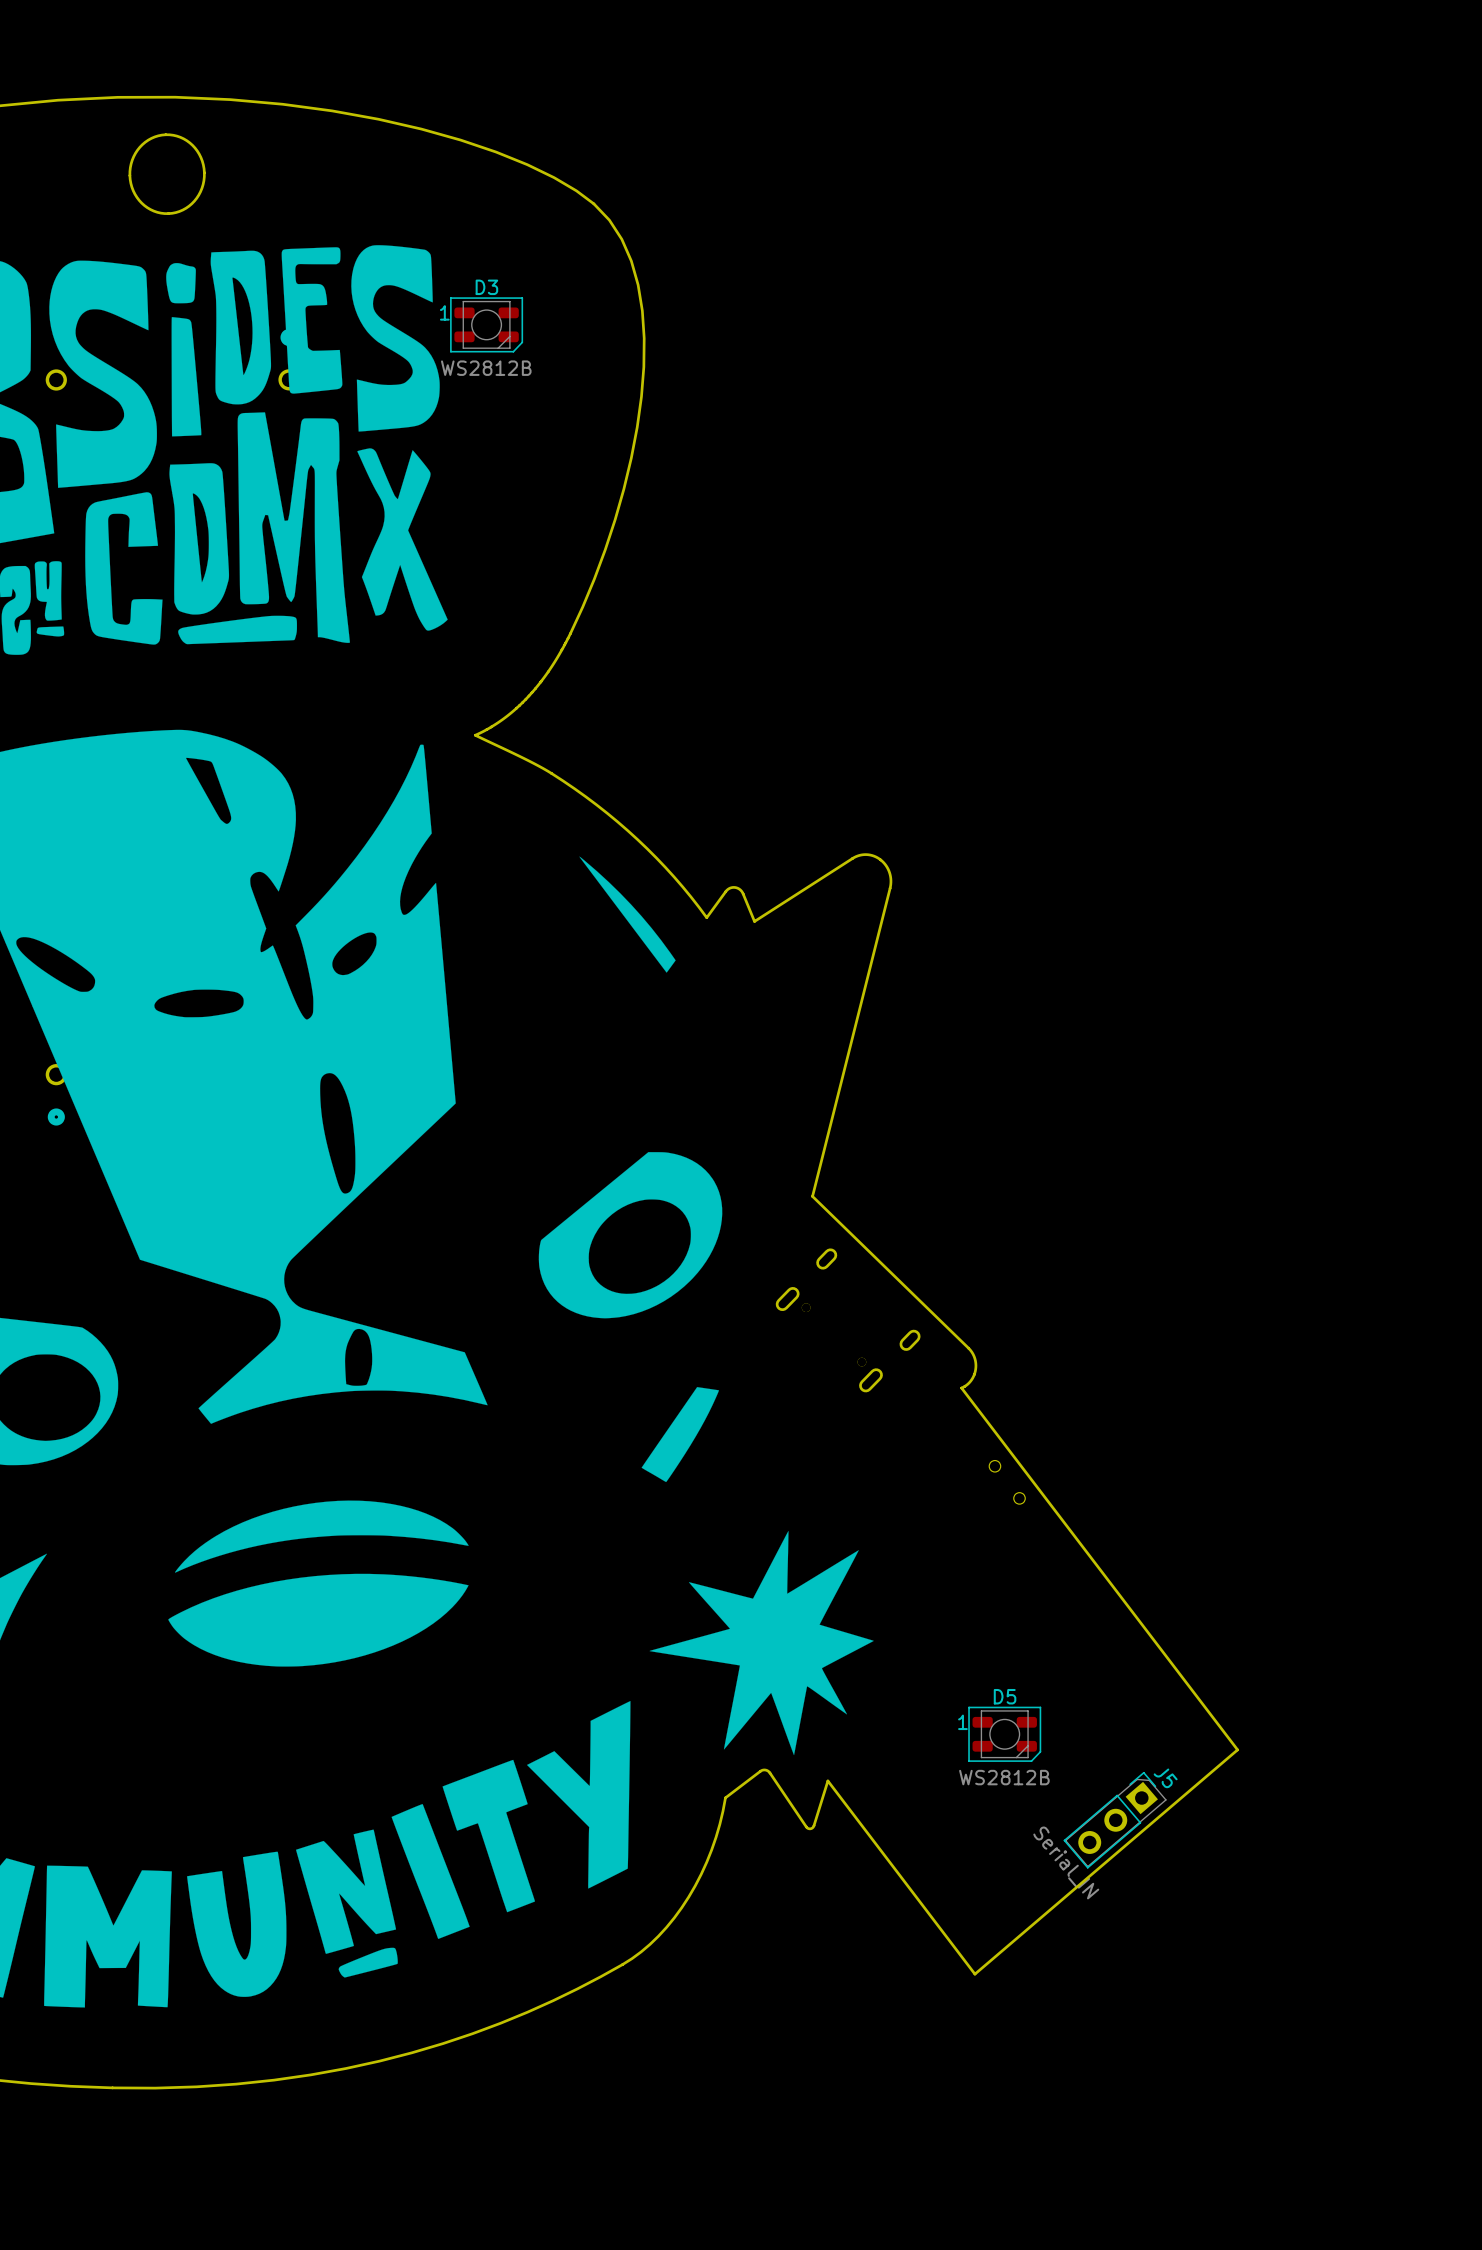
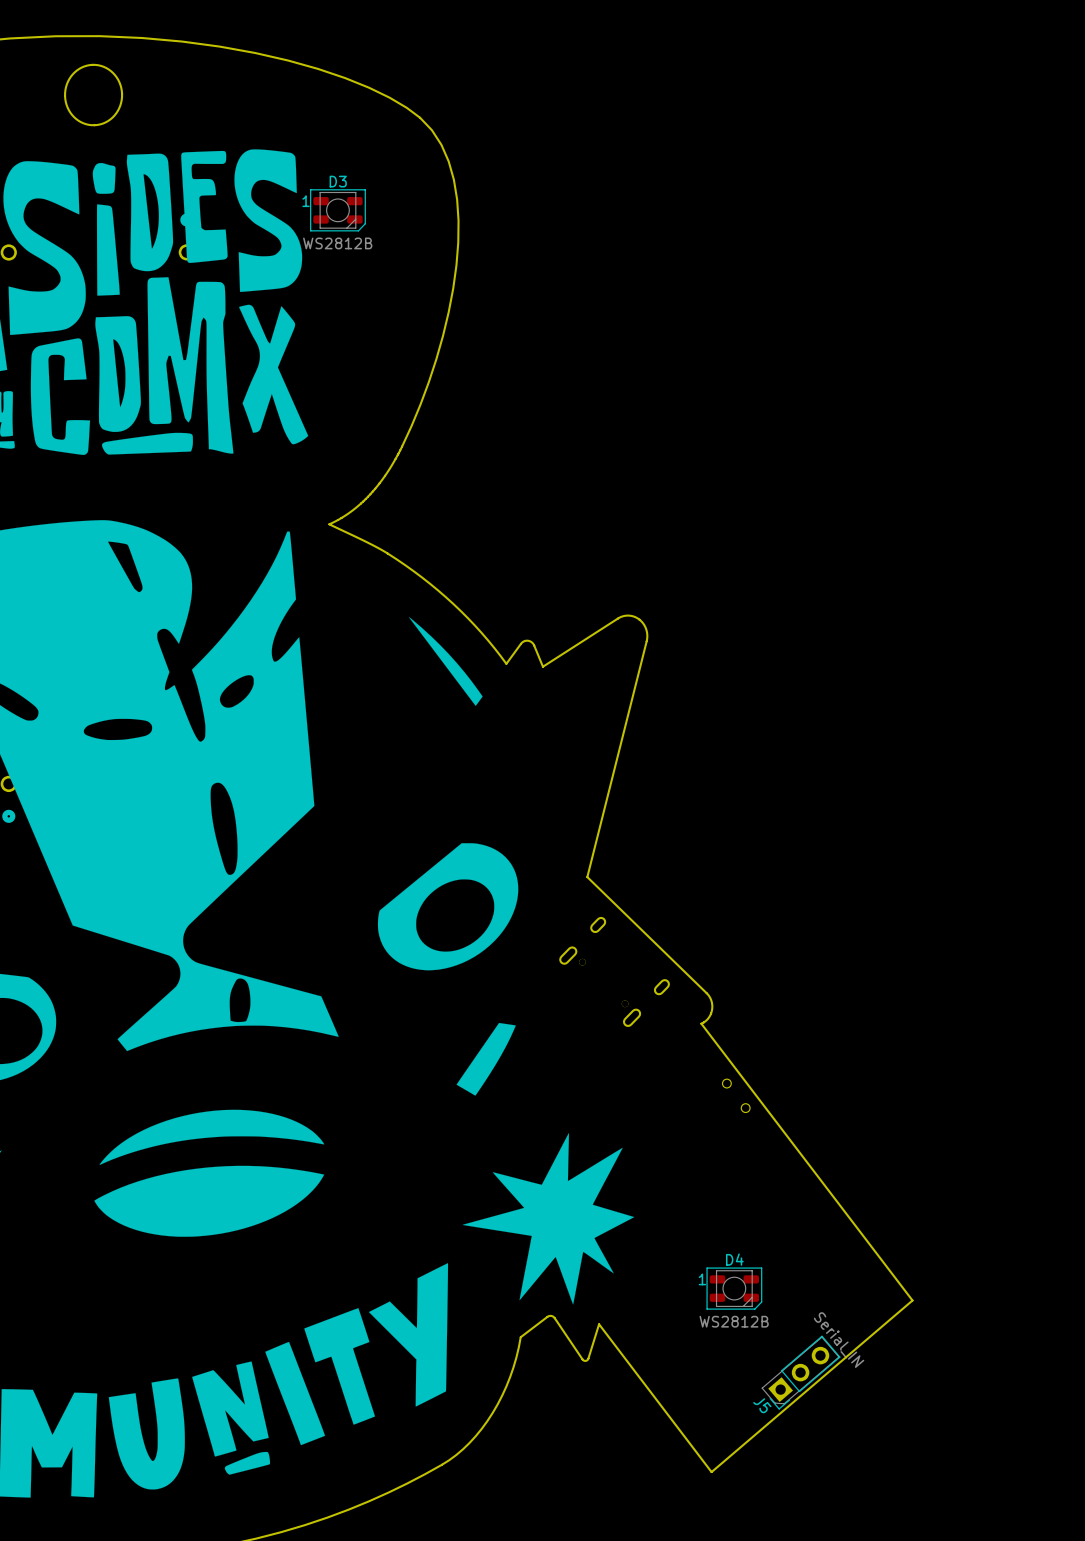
D5 name: D5 (1005, 1696) -> D4 (734, 1259)
J5 rotation: 0° (1115, 1820) -> 180° (801, 1372)

